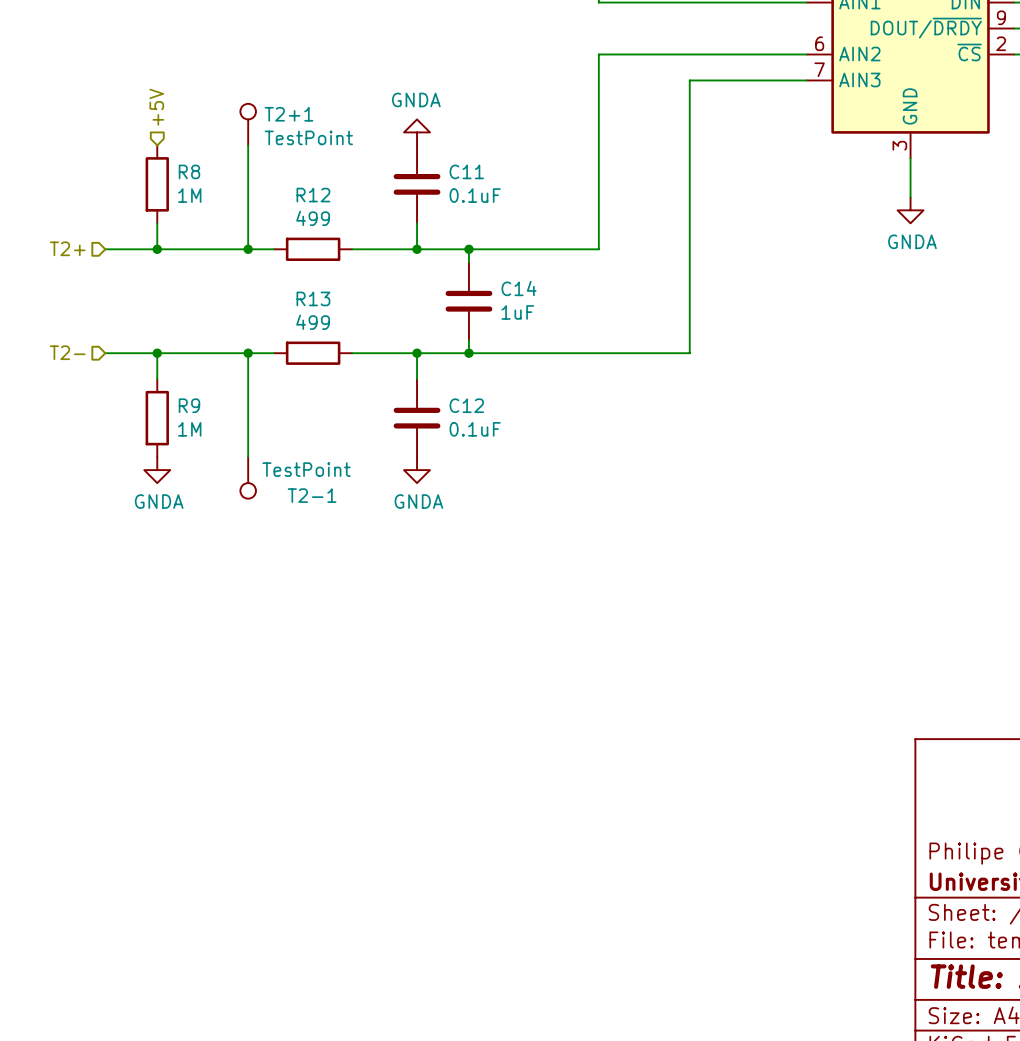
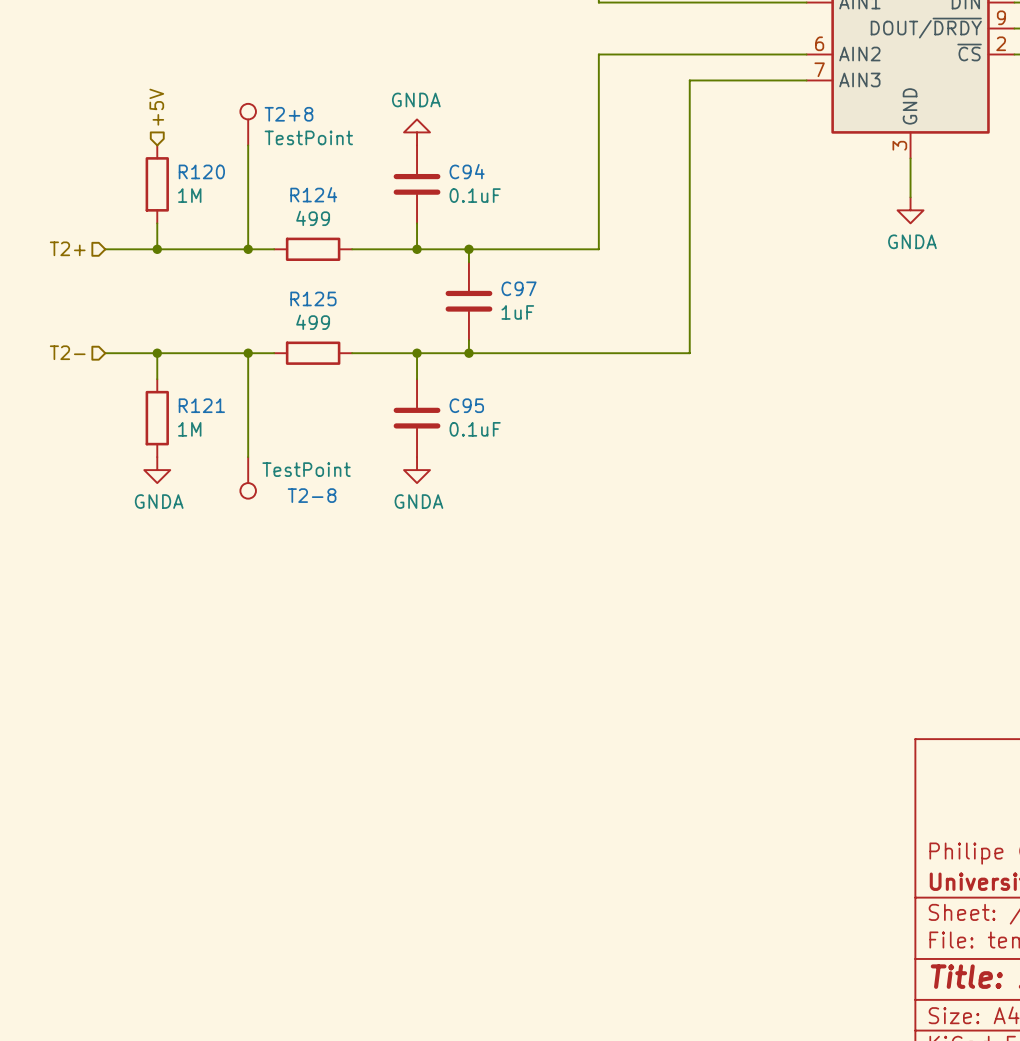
T2+1 name: T2+1 (289, 114) -> T2+8 (289, 114)
R8 name: R8 (189, 171) -> R120 (201, 171)
C11 name: C11 (466, 171) -> C94 (467, 171)
R12 name: R12 (313, 195) -> R124 (313, 194)
C14 name: C14 (519, 288) -> C97 (519, 288)
R13 name: R13 (313, 298) -> R125 (313, 298)
R9 name: R9 (189, 405) -> R121 (201, 405)
C12 name: C12 (466, 405) -> C95 (466, 405)
T2-1 name: T2-1 (312, 495) -> T2-8 (312, 495)

